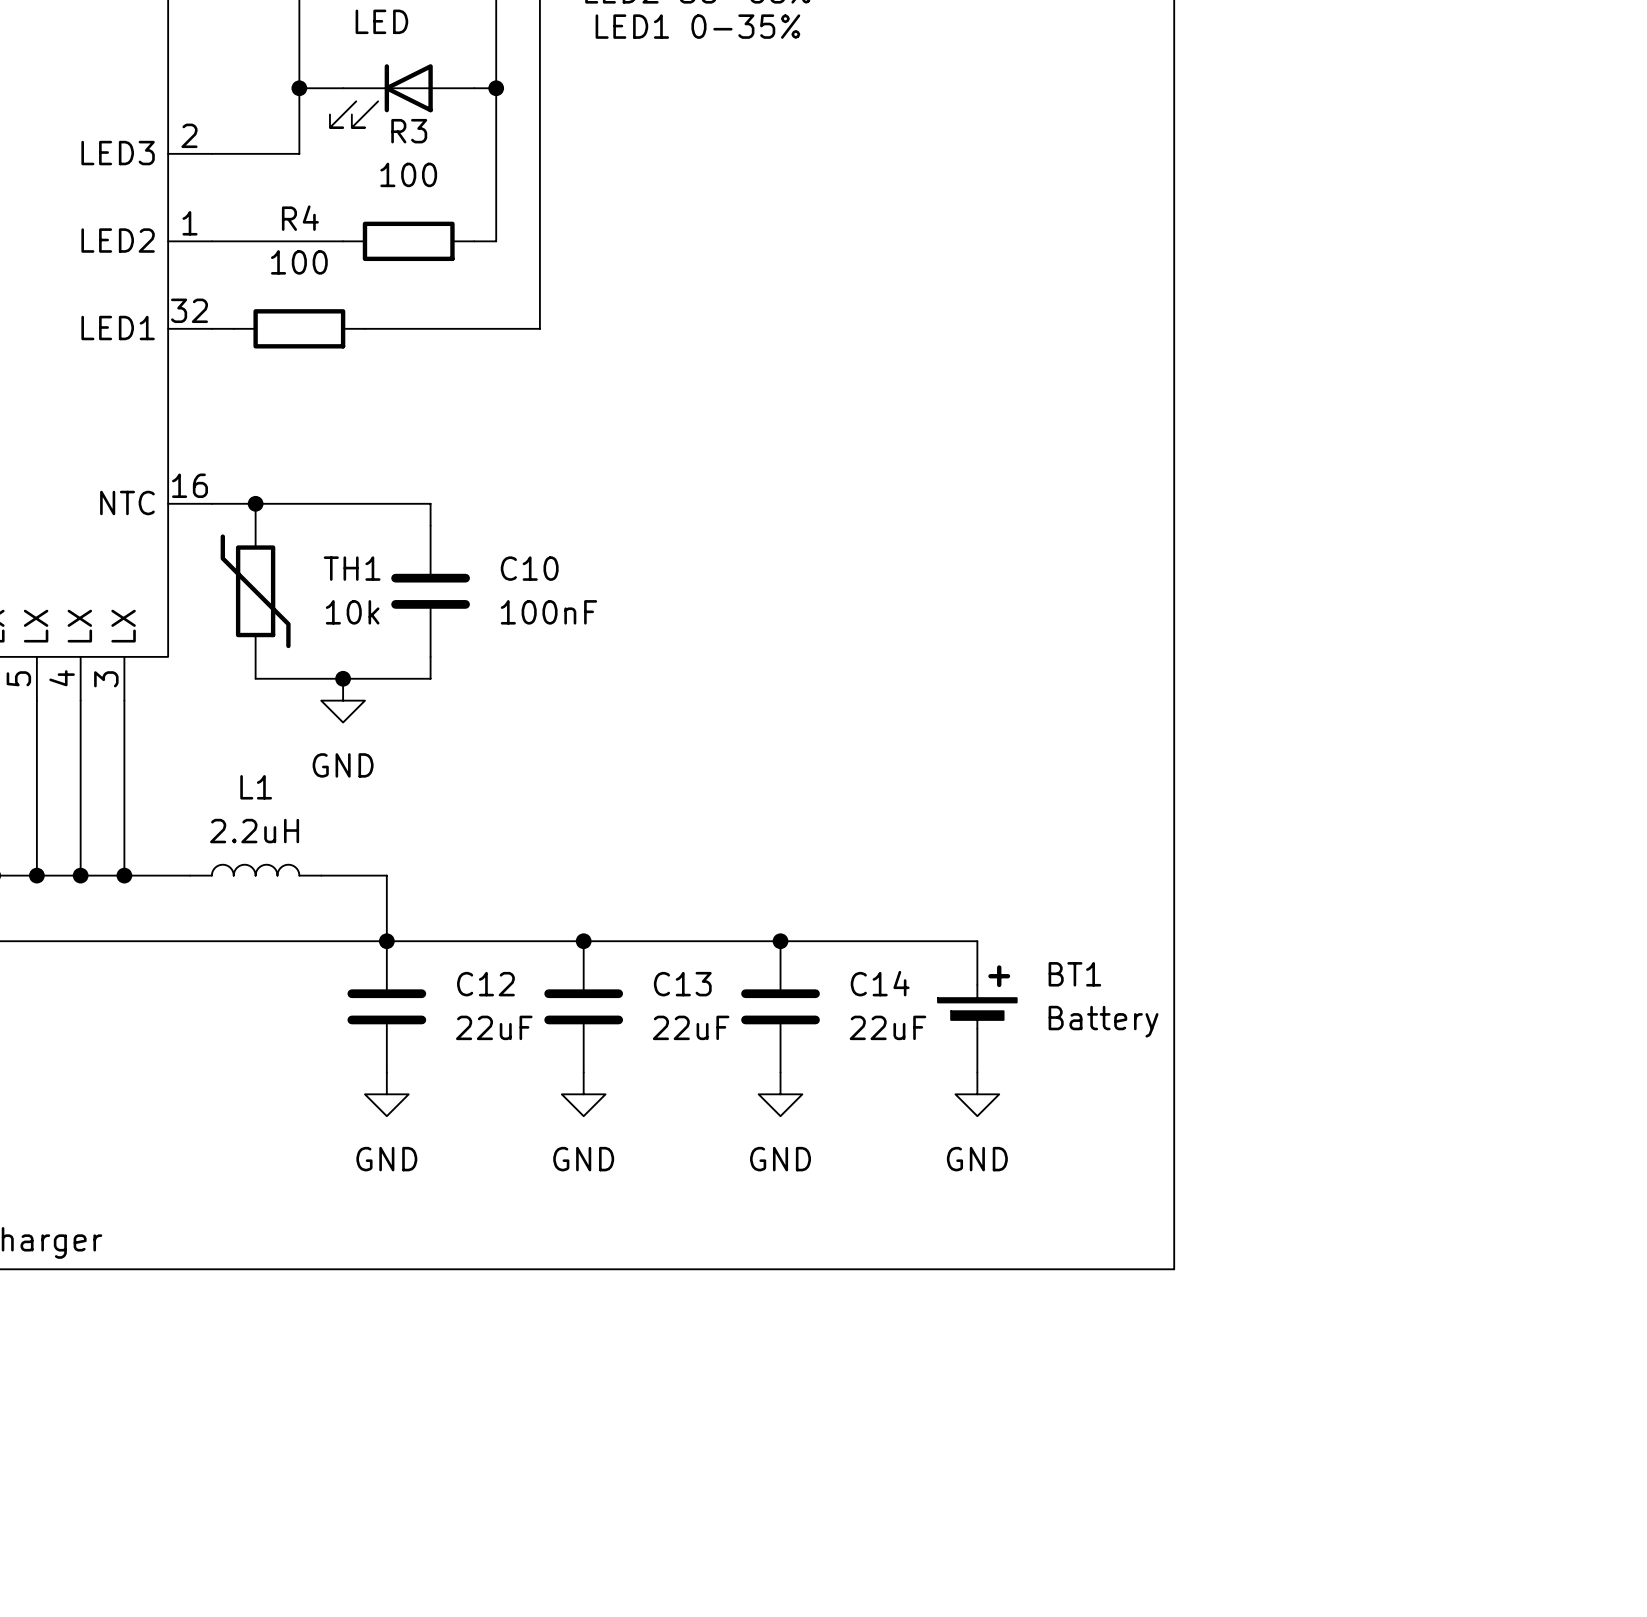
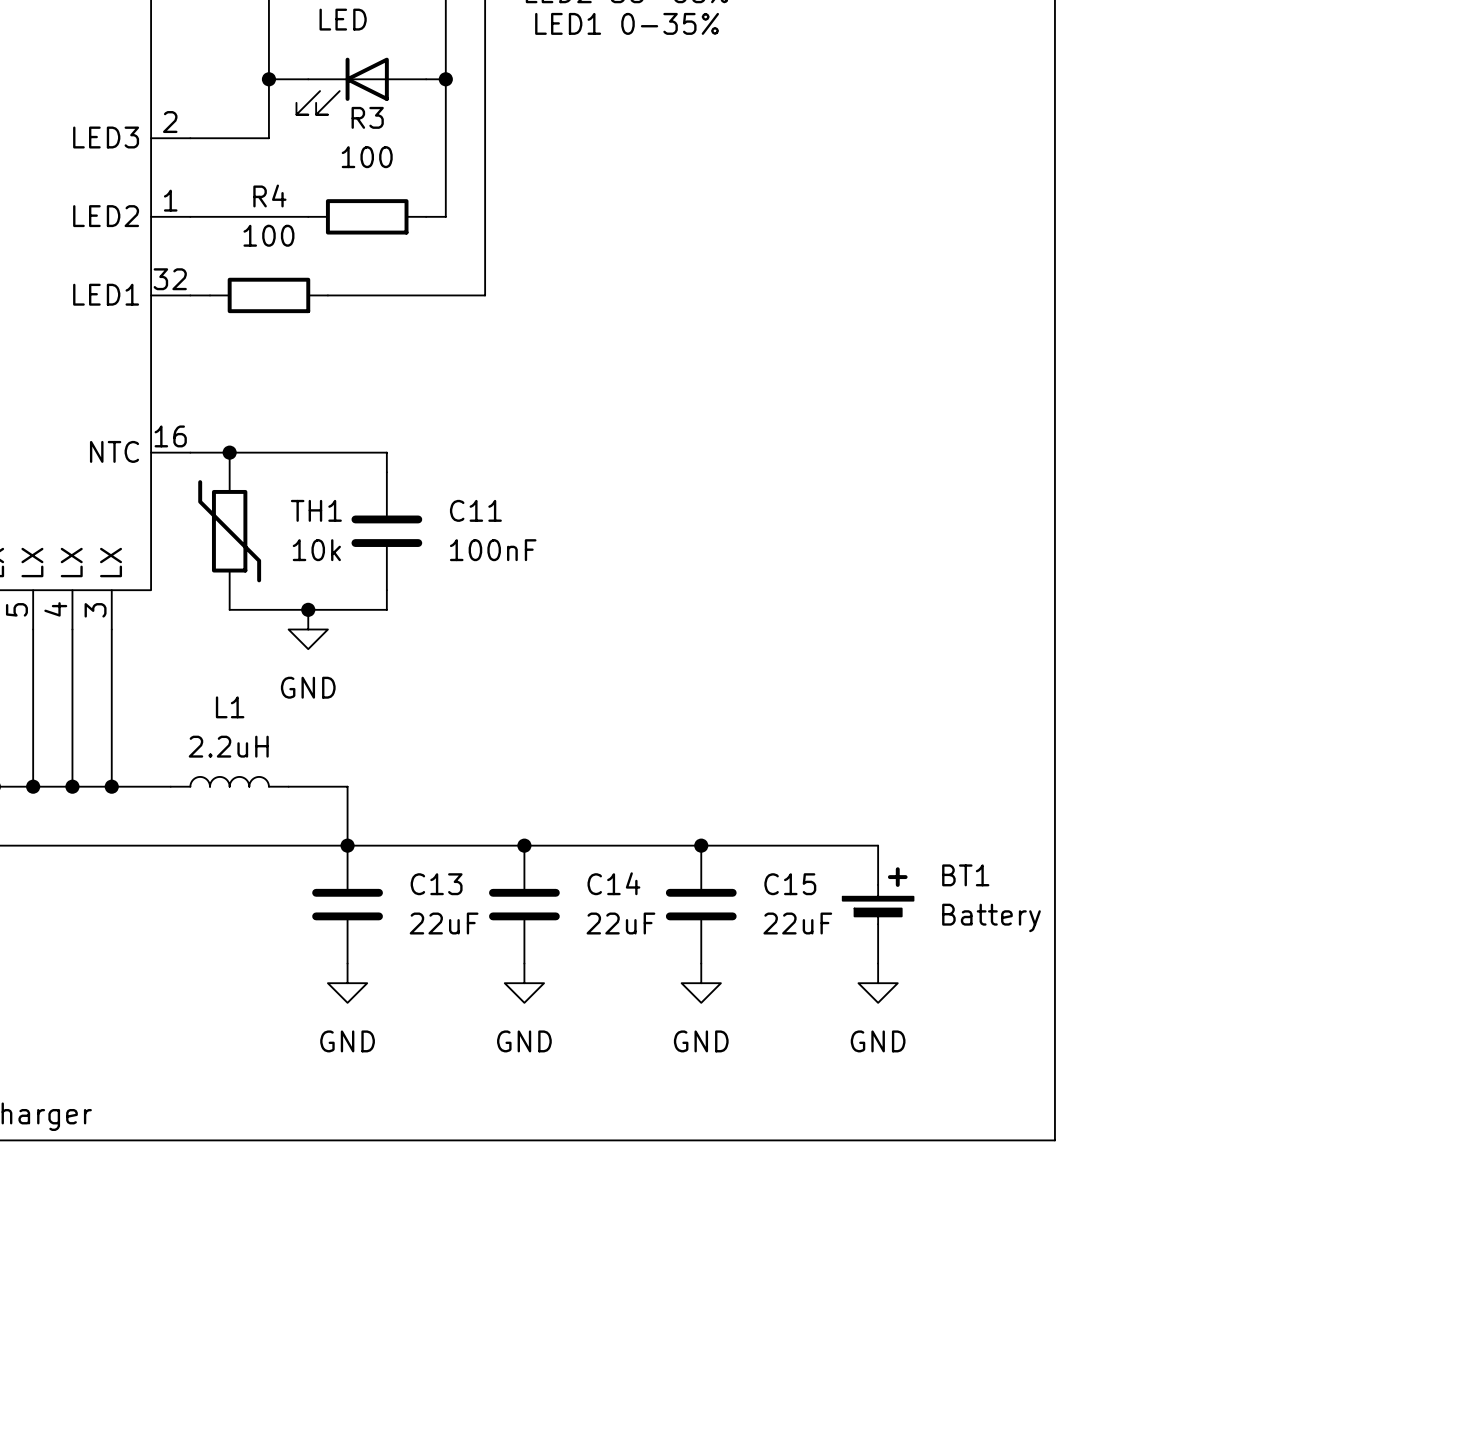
C10 name: C10 (529, 568) -> C11 (475, 510)
C14 name: C14 (880, 983) -> C15 (790, 884)
C12 name: C12 (485, 984) -> C13 (436, 884)
C13 name: C13 (682, 984) -> C14 (613, 883)

